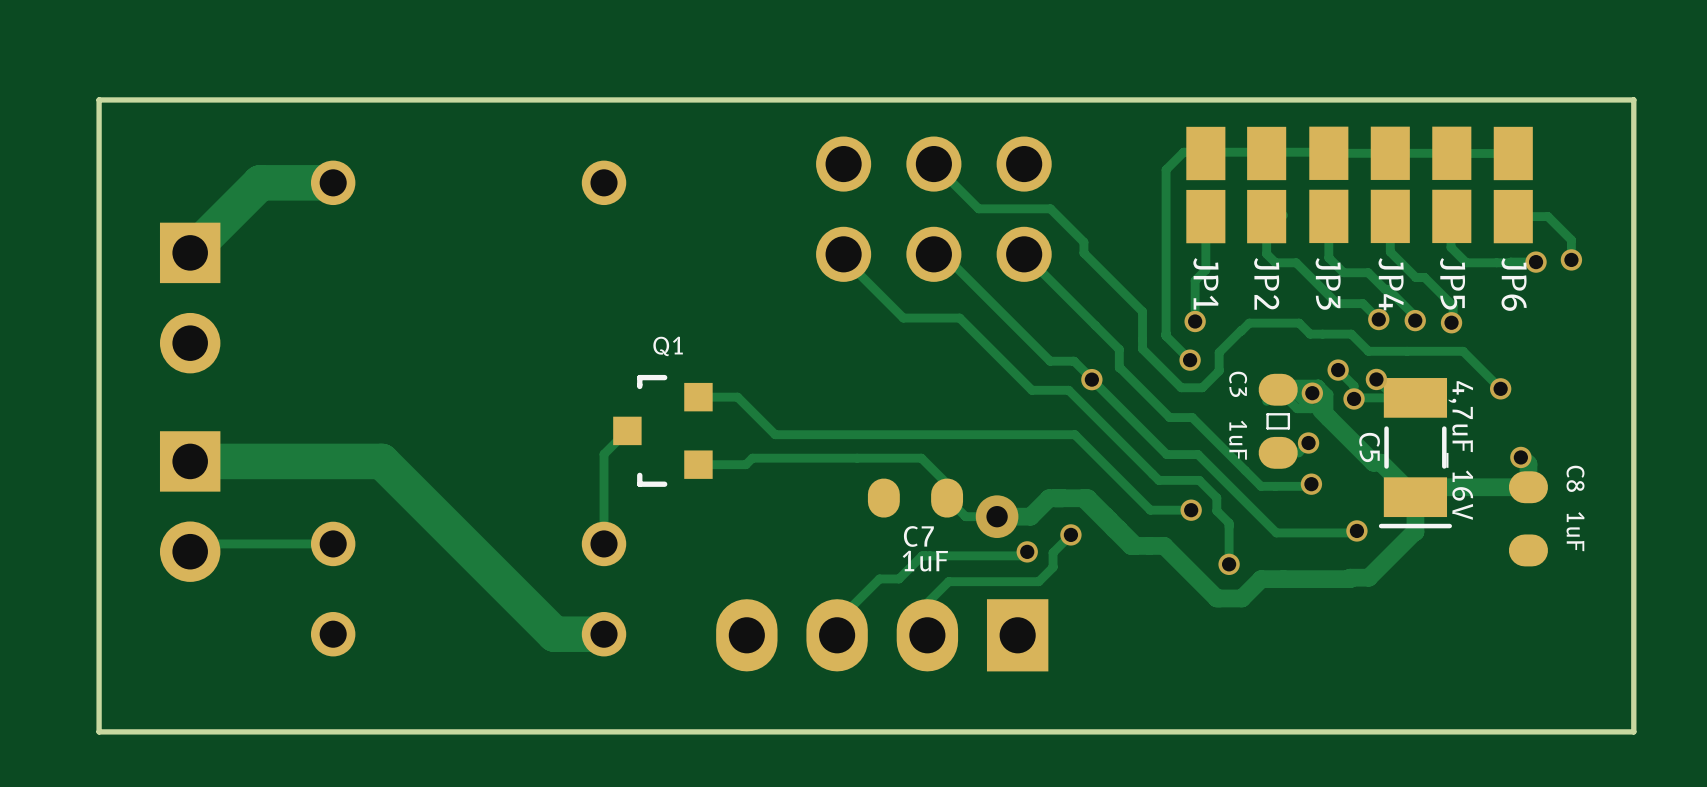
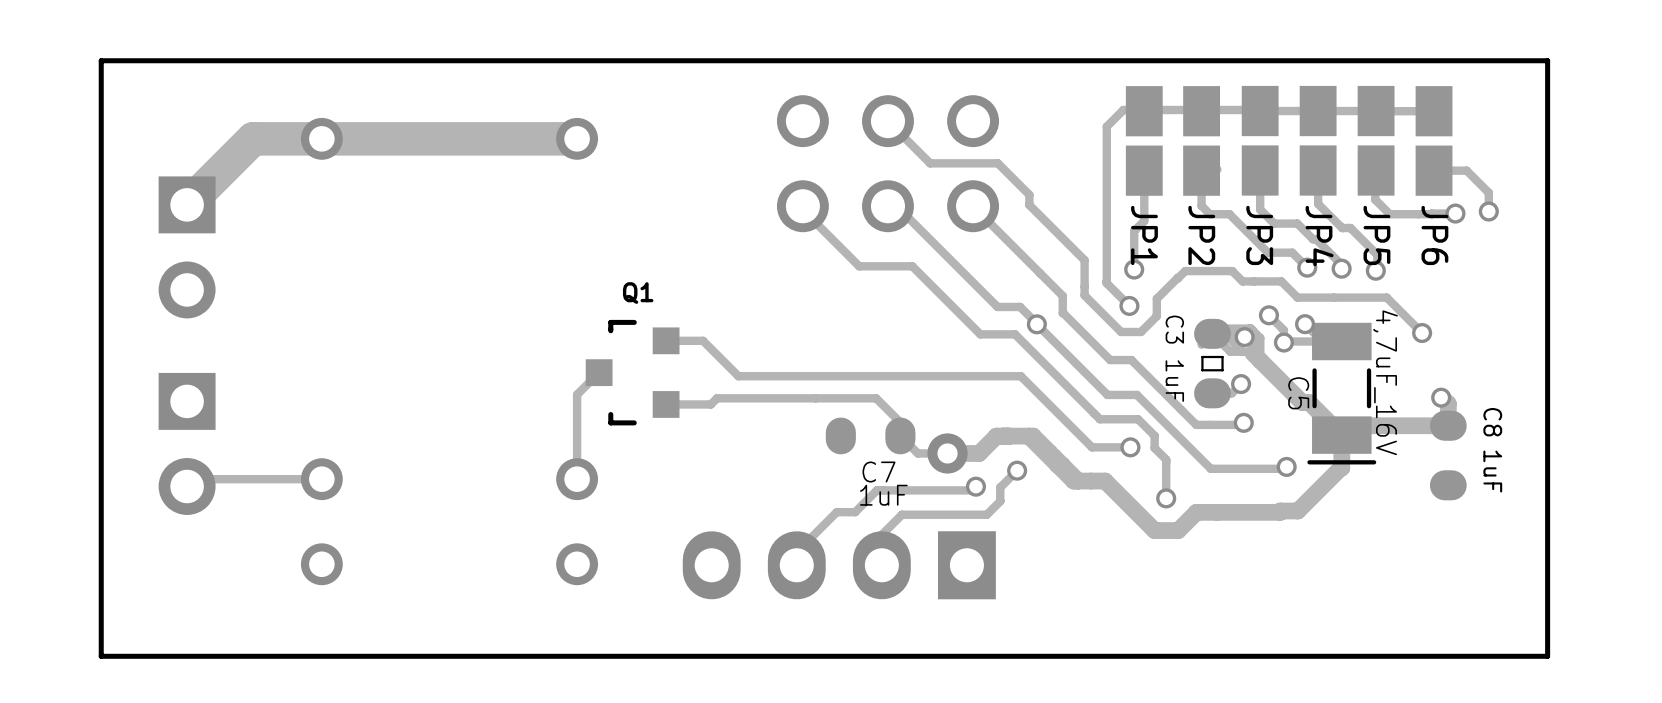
track: none -> (577, 138) (321, 138)
track: (190, 461) (381, 461) (554, 634) (604, 634) -> none

